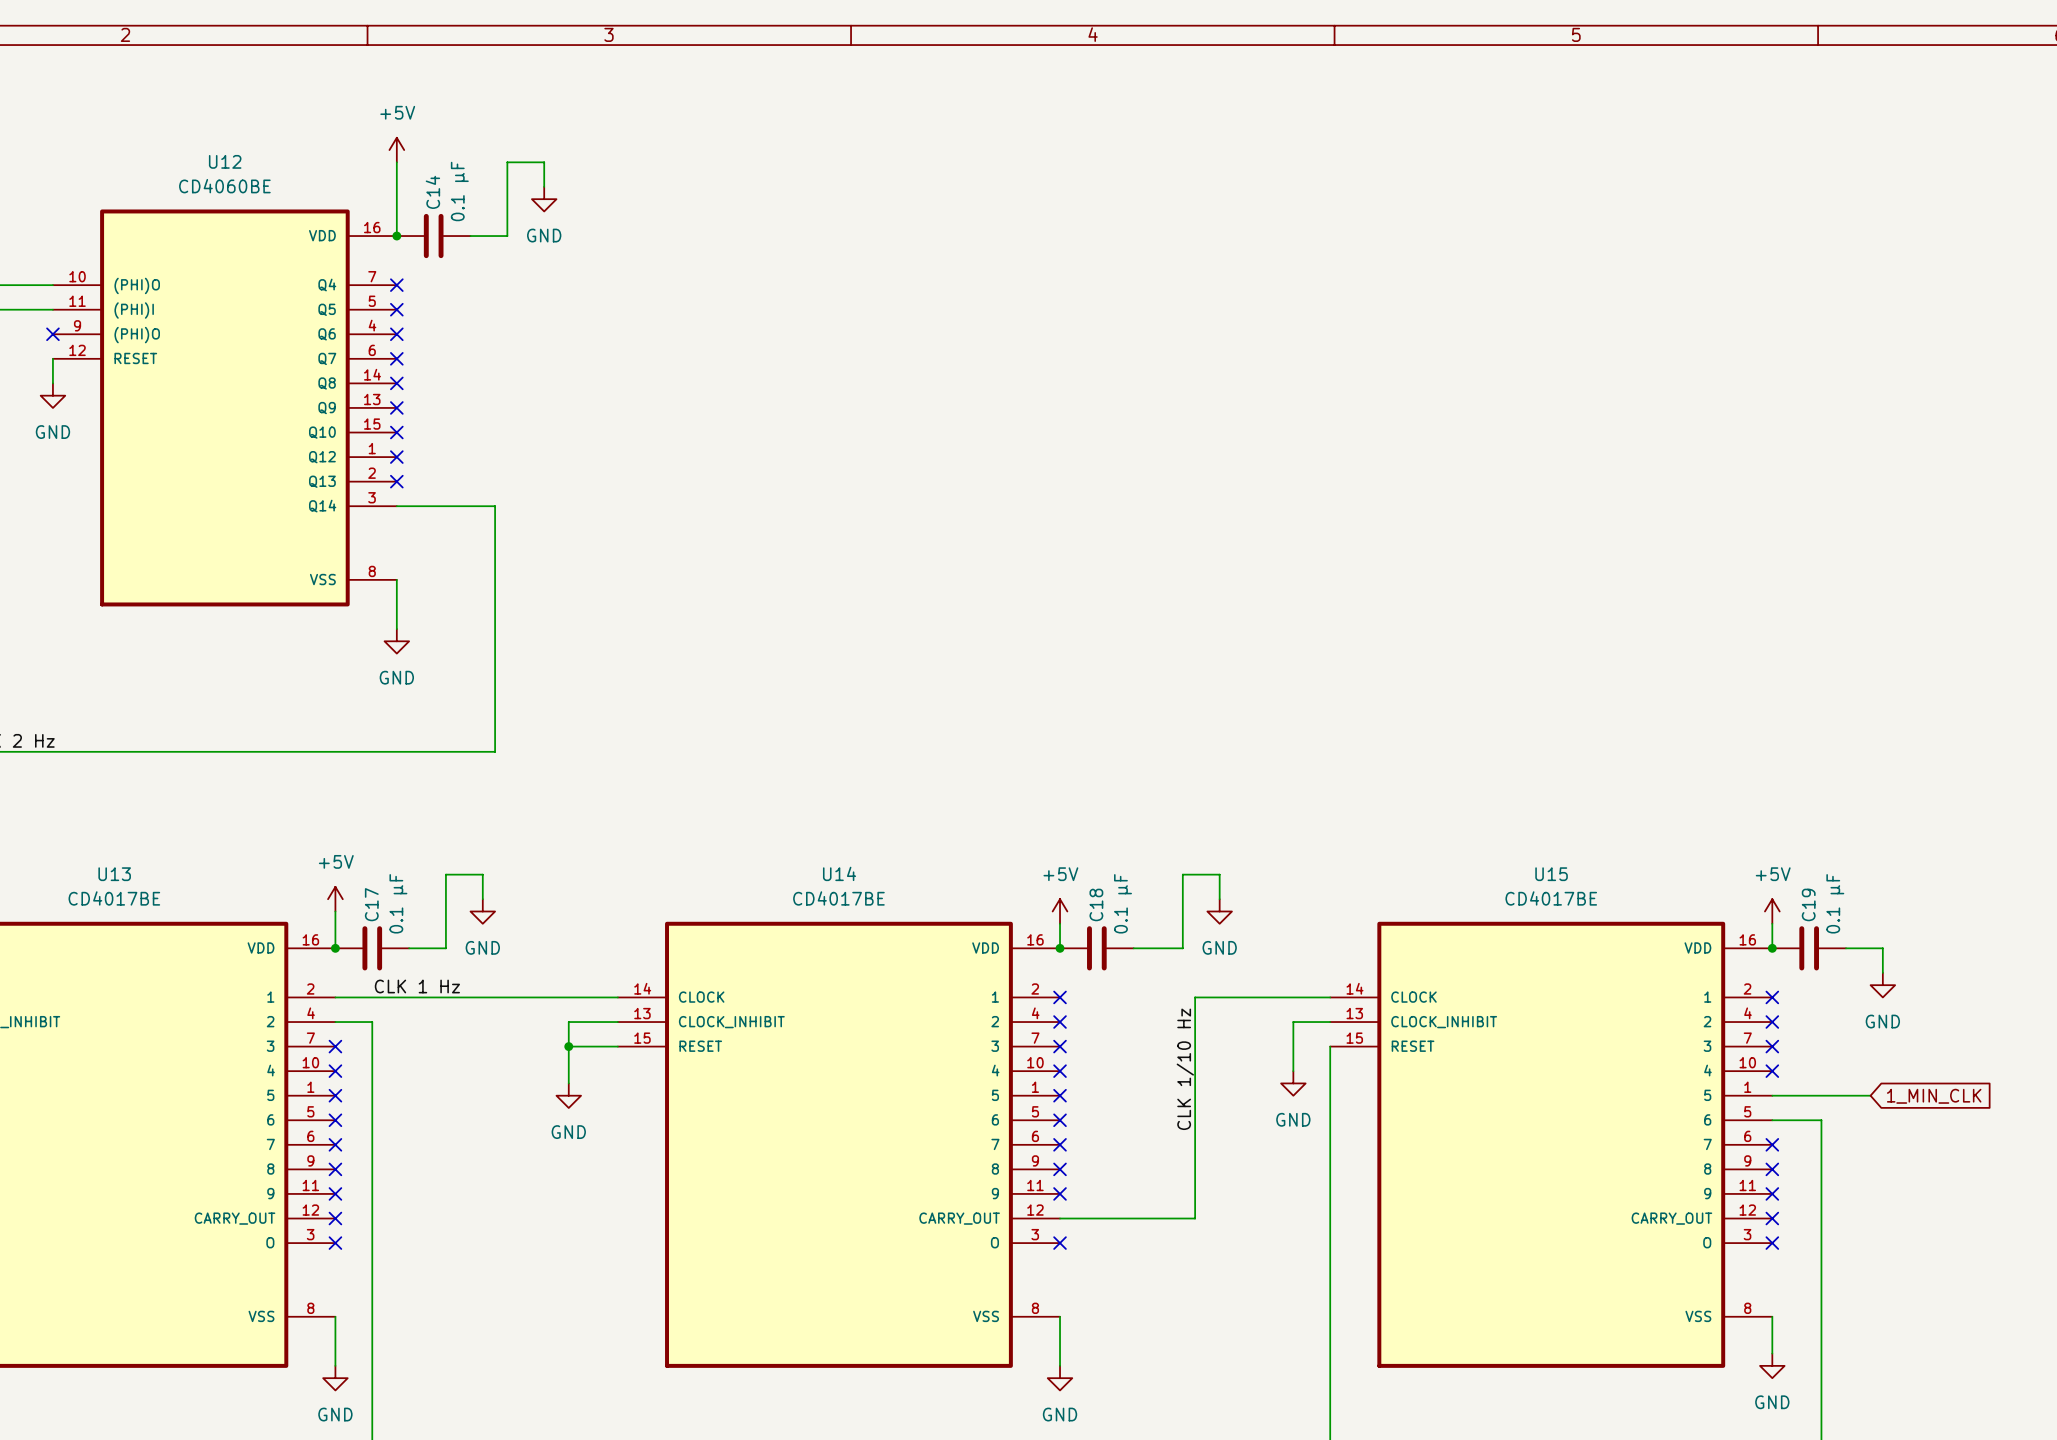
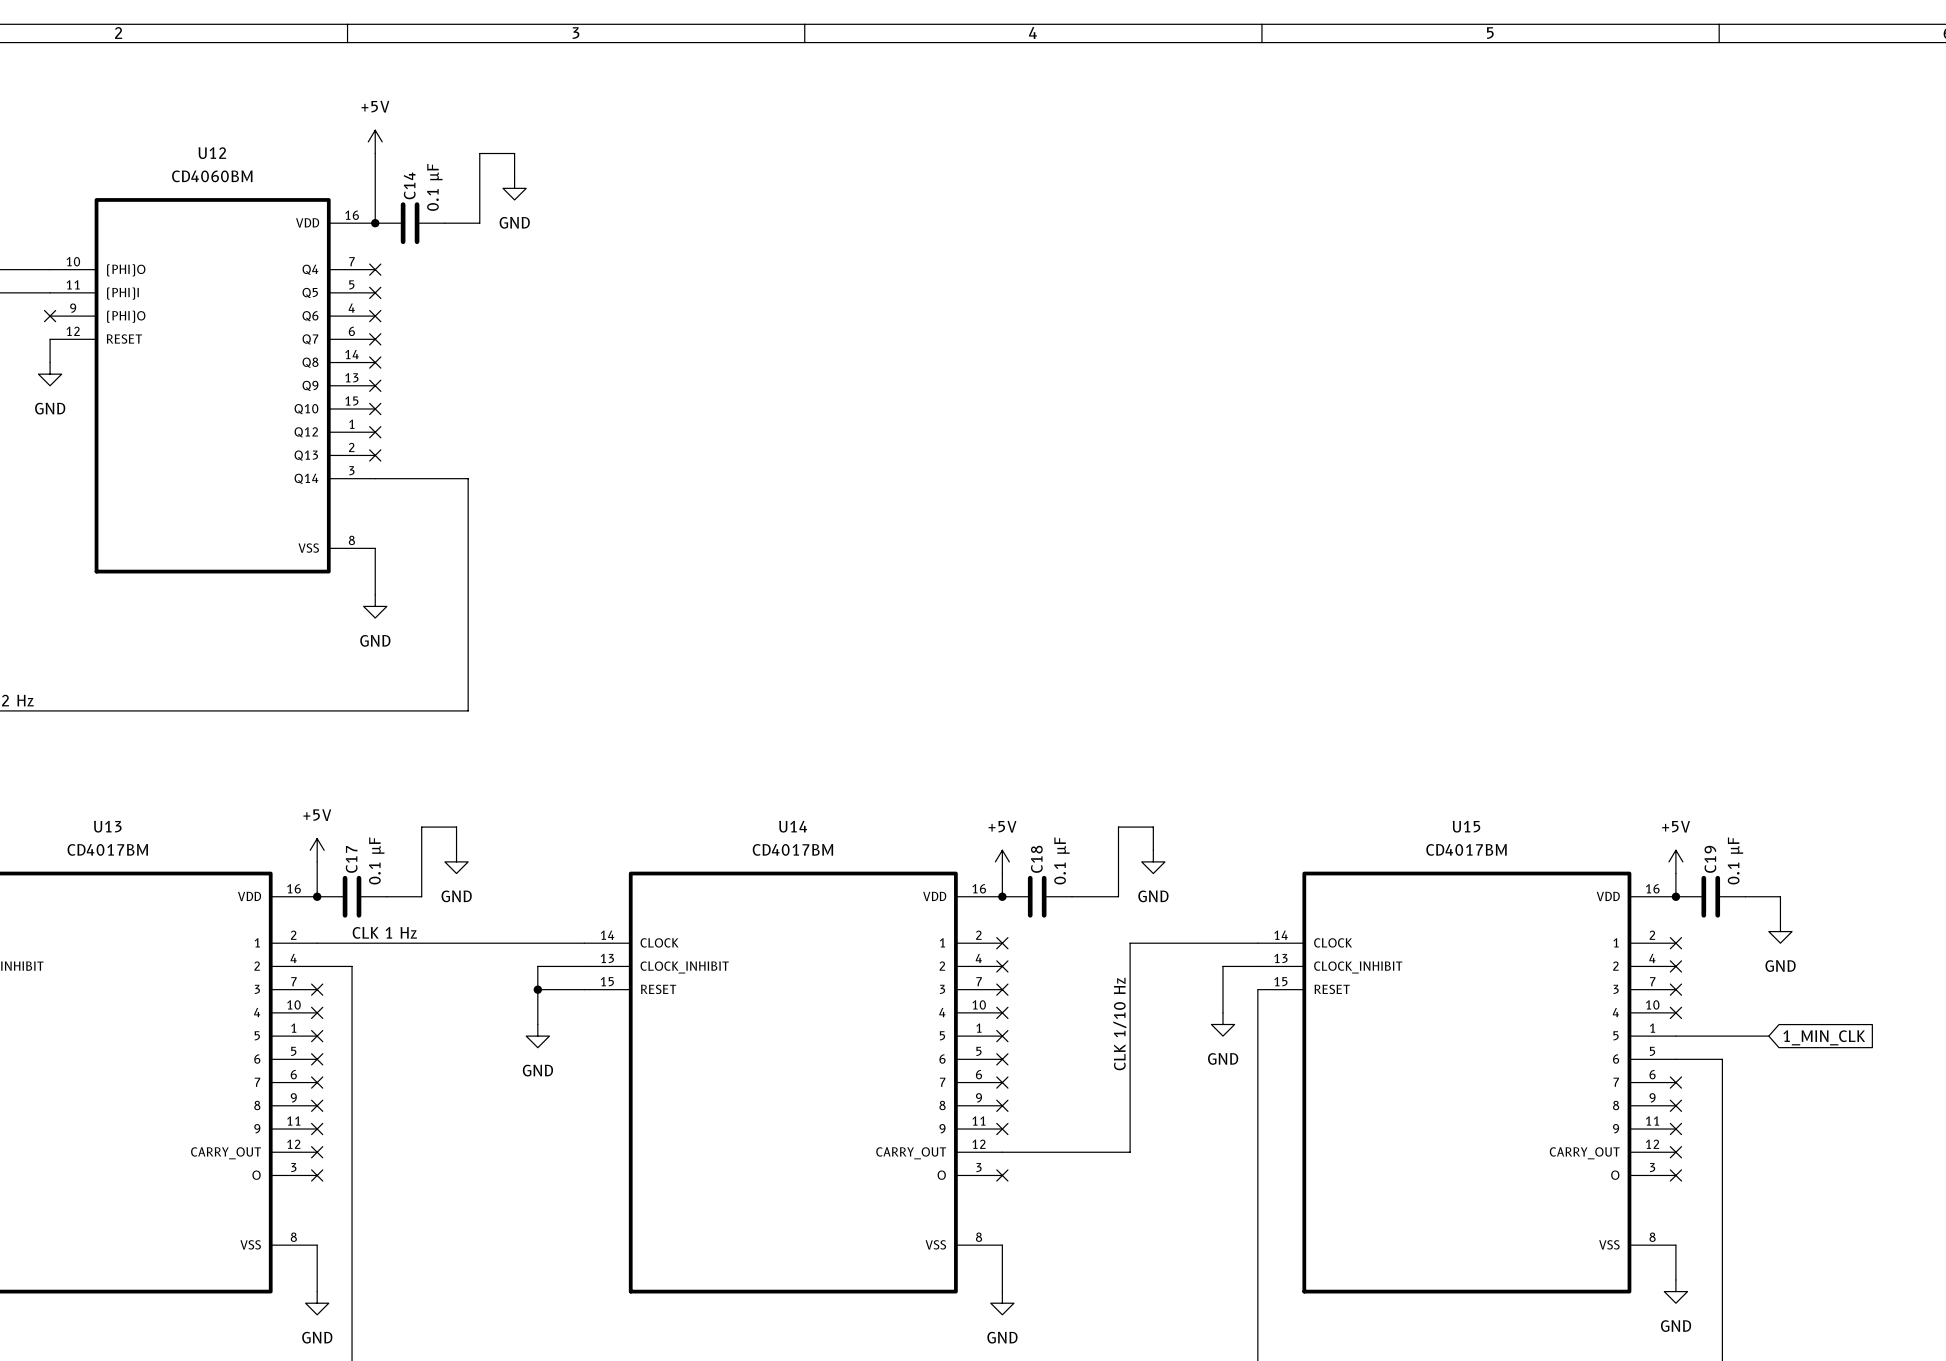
U12 value: CD4060BE (224, 186) -> CD4060BM (212, 176)
U13 value: CD4017BE (114, 898) -> CD4017BM (107, 849)
U14 value: CD4017BE (838, 898) -> CD4017BM (792, 849)
U15 value: CD4017BE (1551, 898) -> CD4017BM (1466, 849)

